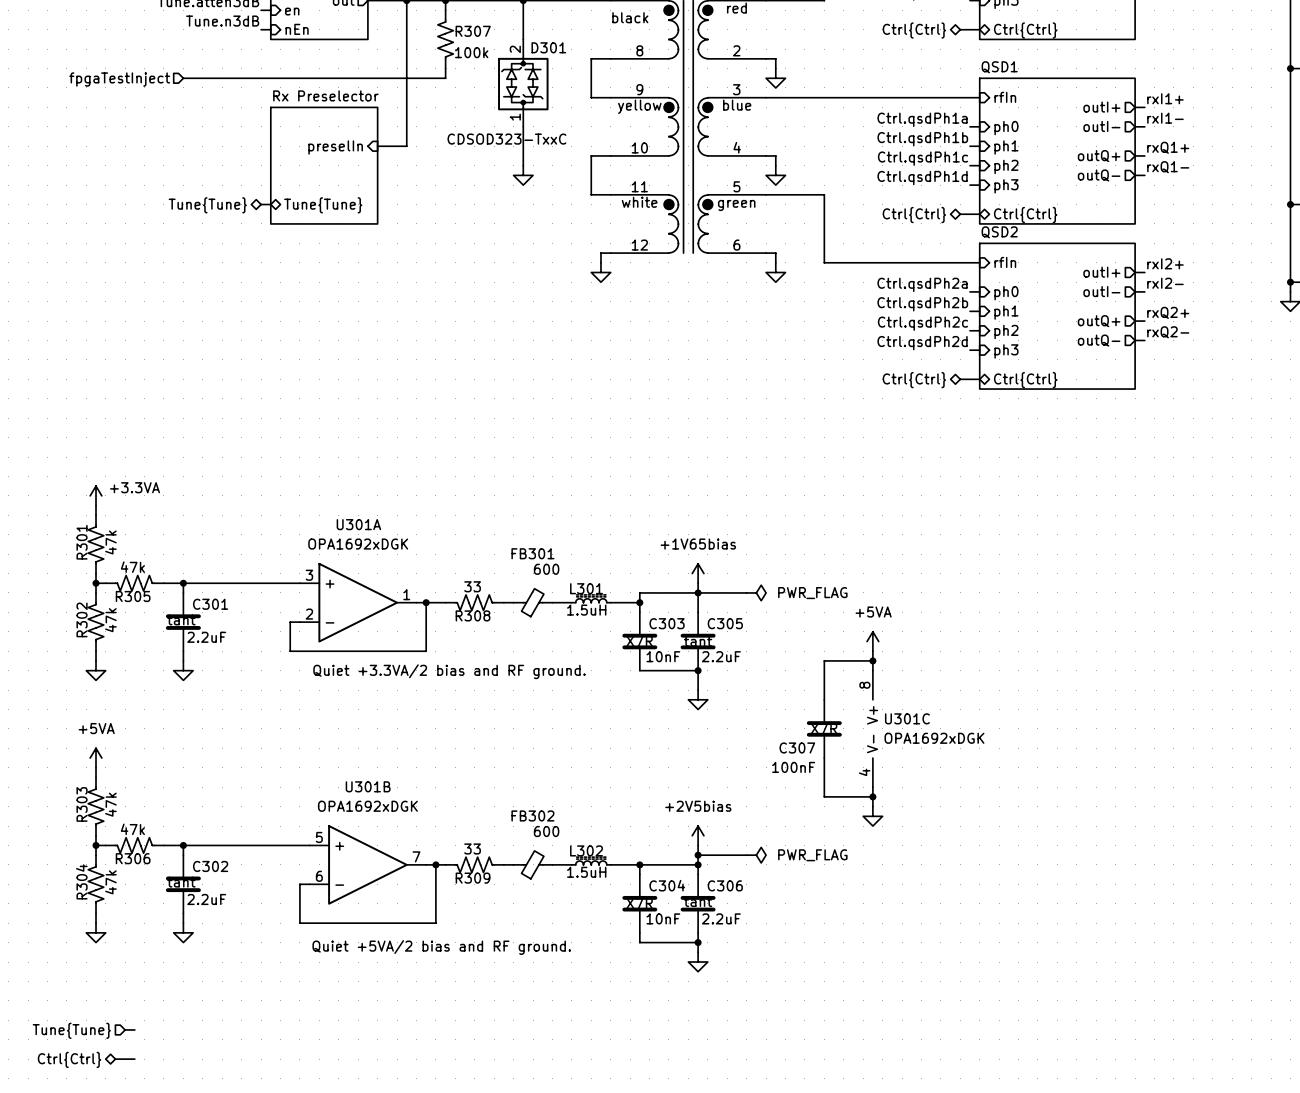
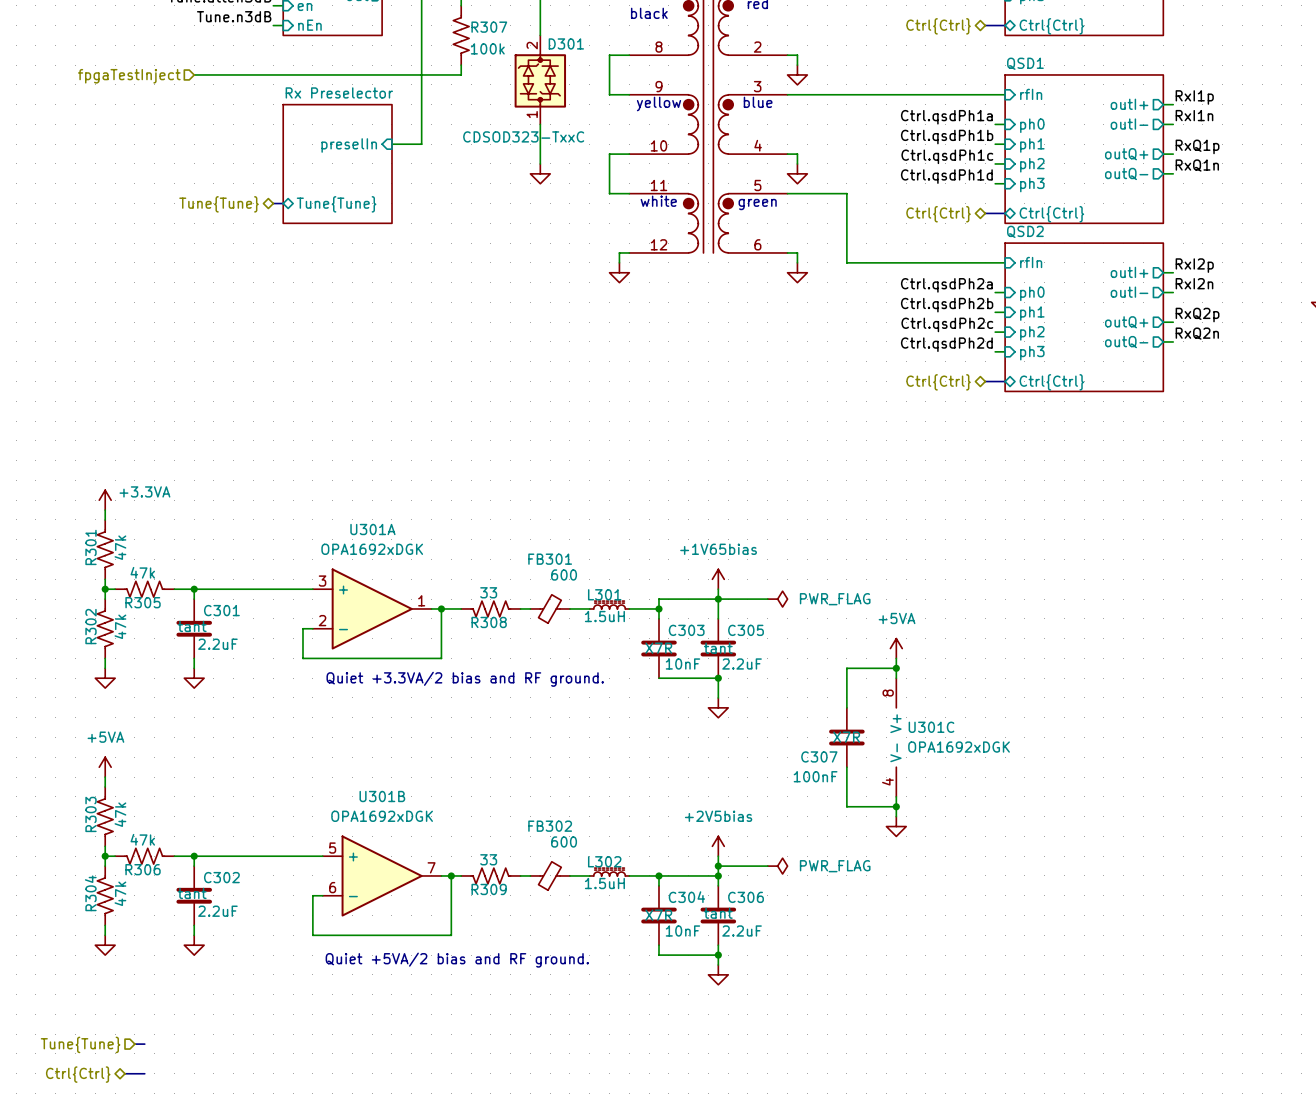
label: rxI1+ (1165, 98) -> RxI1p (1194, 97)
label: rxI1- (1165, 118) -> RxI1n (1194, 115)
label: rxQ1+ (1168, 147) -> RxQ1p (1197, 146)
label: rxQ1- (1168, 167) -> RxQ1n (1197, 165)
label: rxI2+ (1165, 263) -> RxI2p (1194, 265)
label: rxI2- (1165, 283) -> RxI2n (1194, 283)
label: rxQ2+ (1168, 312) -> RxQ2p (1197, 315)
label: rxQ2- (1168, 332) -> RxQ2n (1197, 333)

